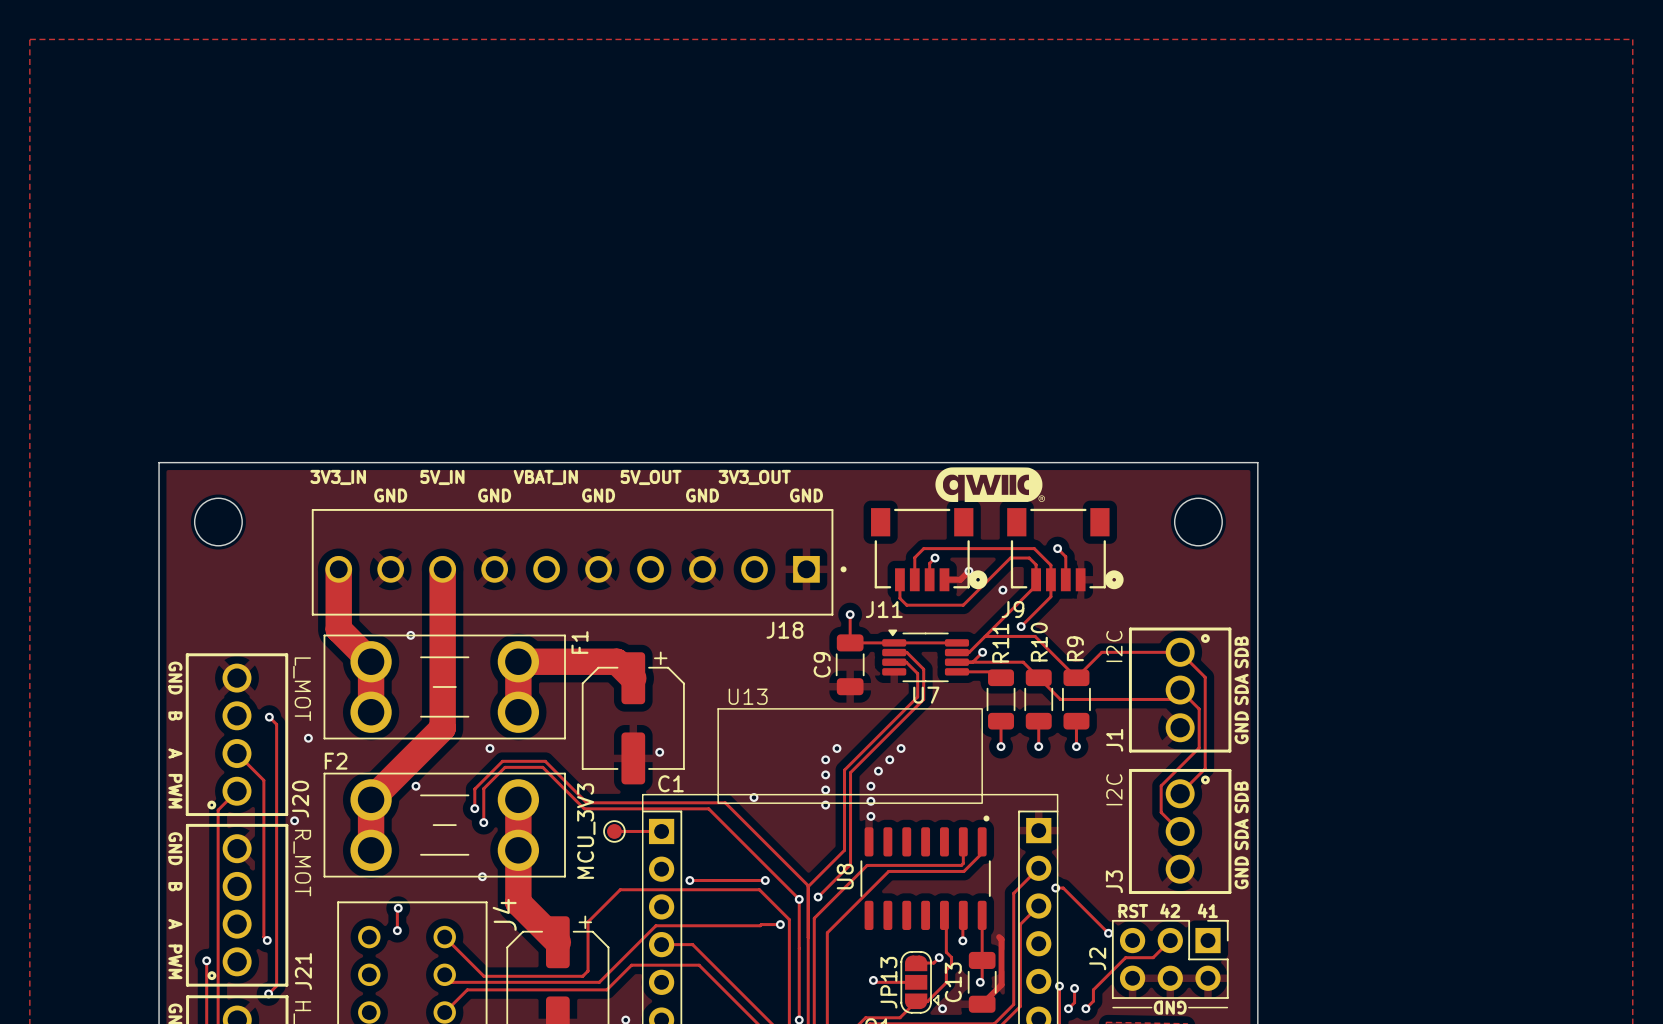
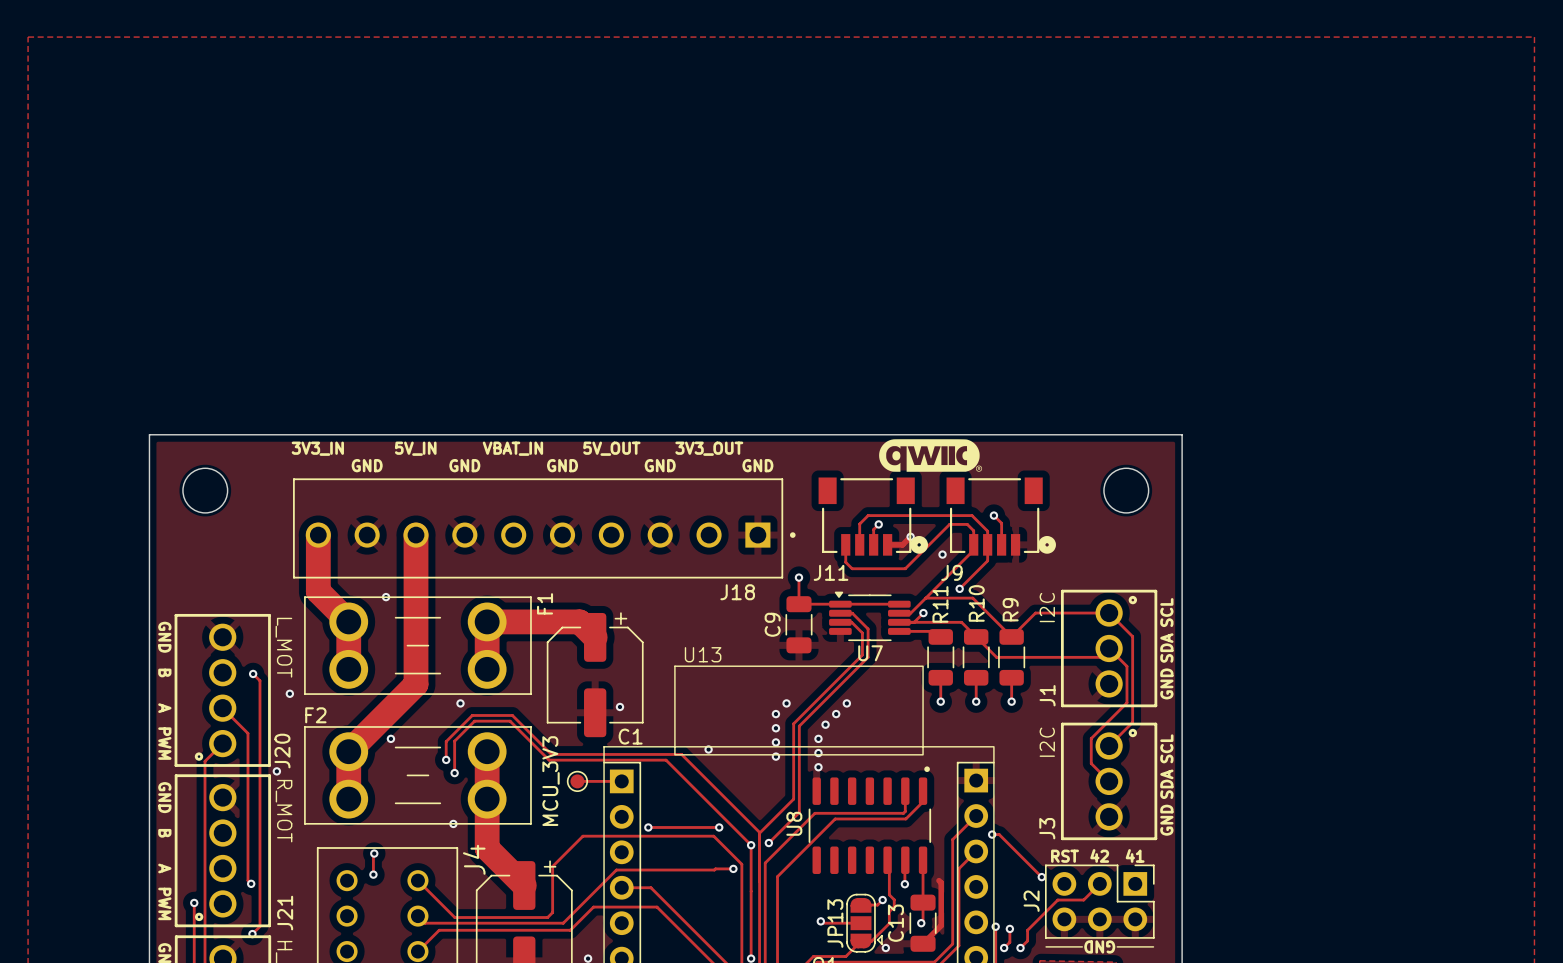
text: SDB (1241, 652) -> SCL (1166, 612)
text: SDB (1241, 797) -> SCL (1166, 748)

